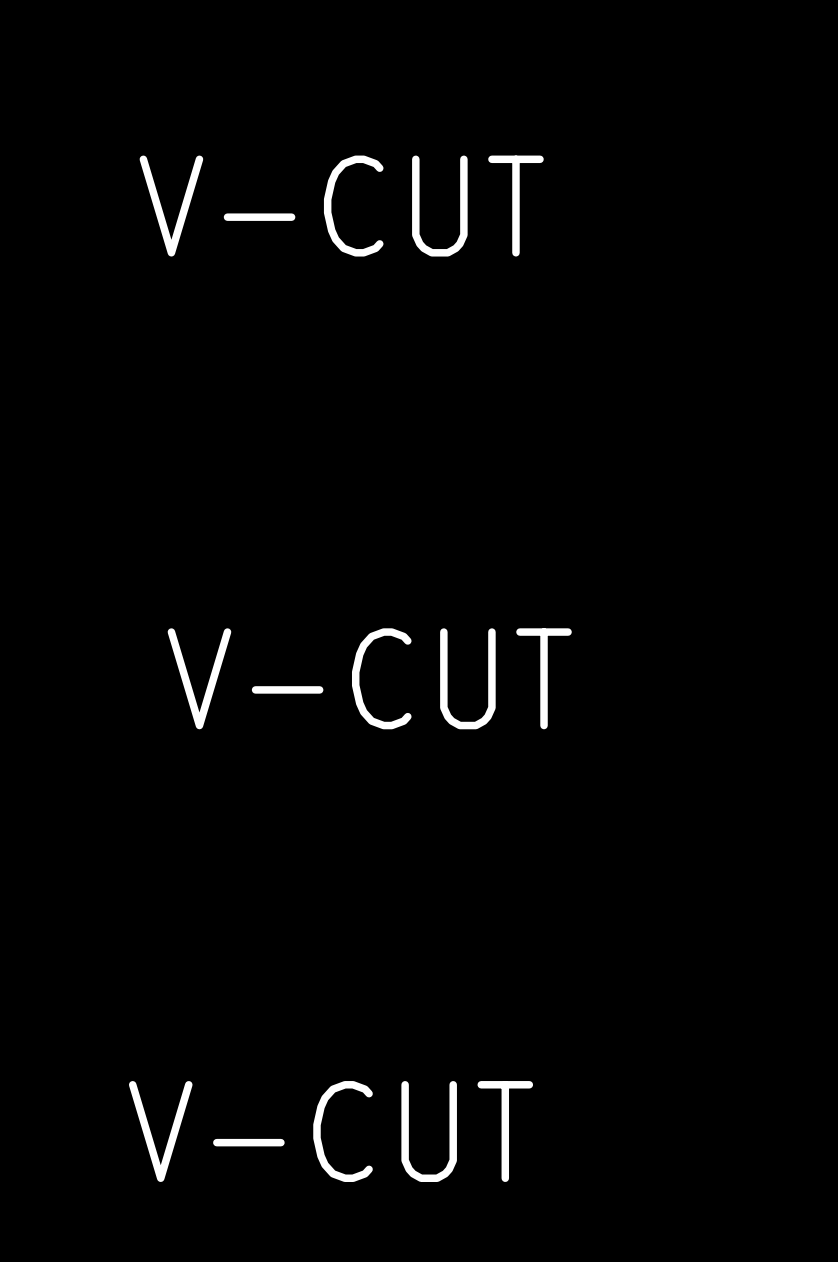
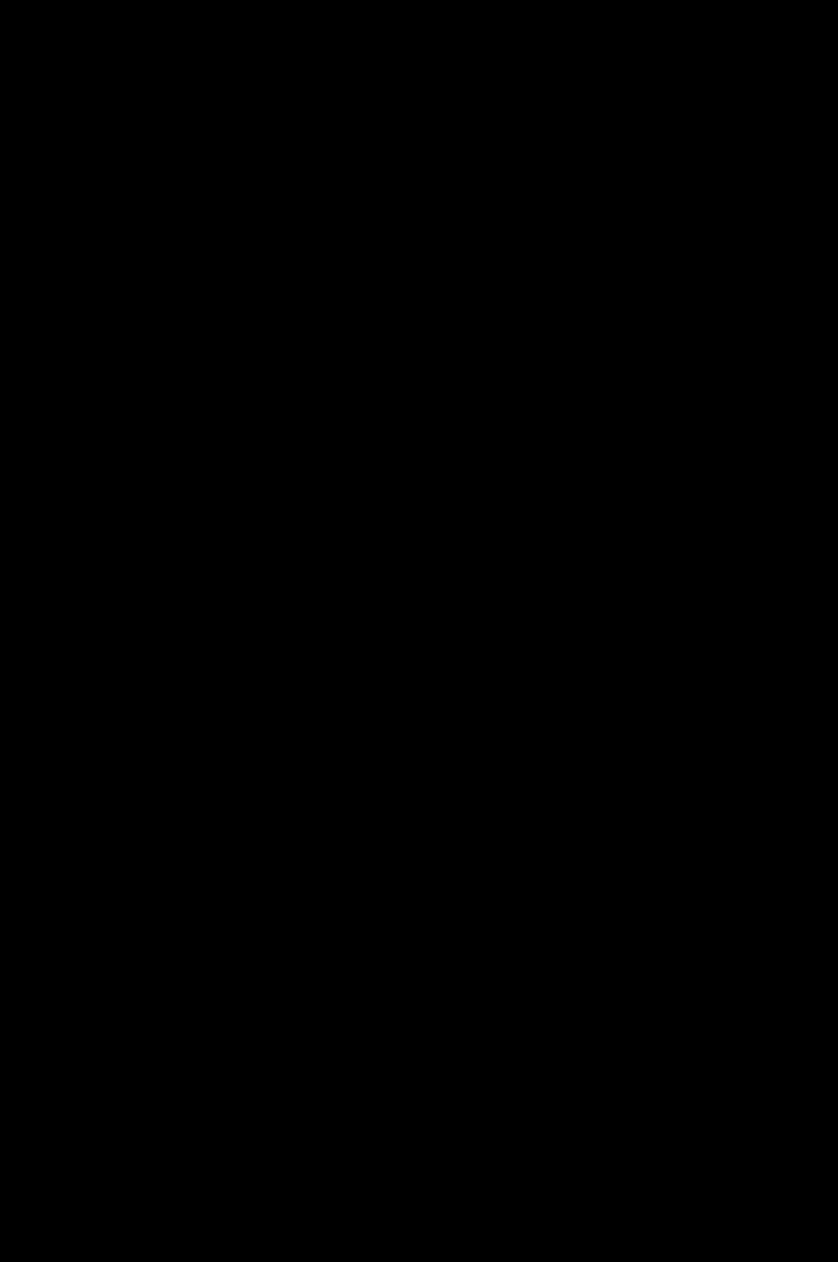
text: V-CUT (341, 206) -> none
text: V-CUT (369, 678) -> none
text: V-CUT (331, 1131) -> none

